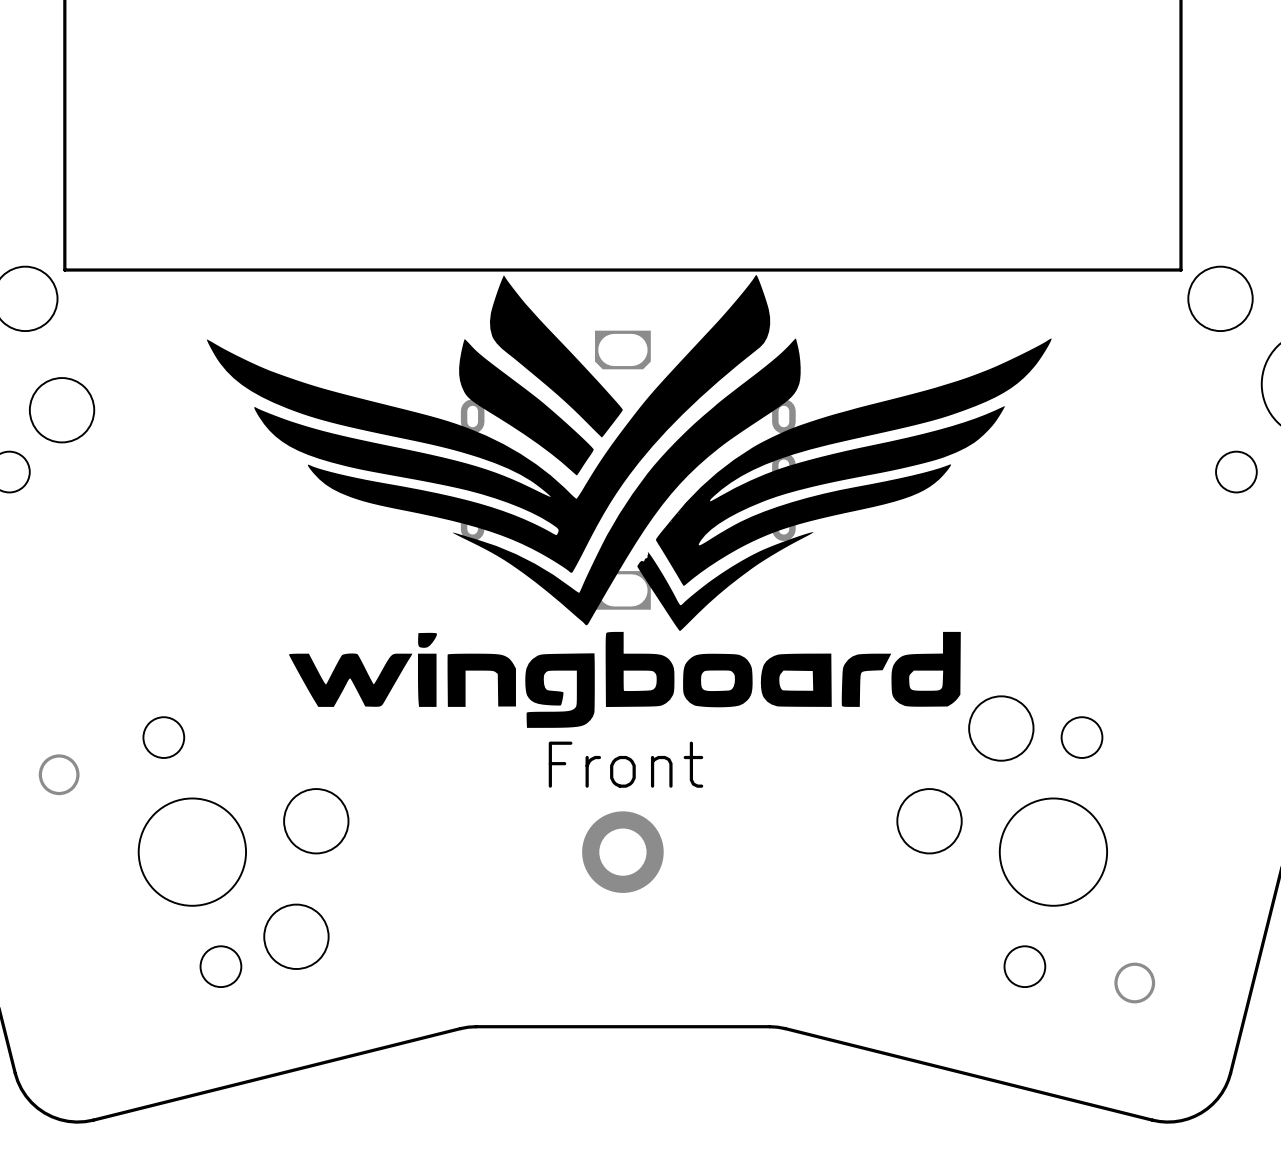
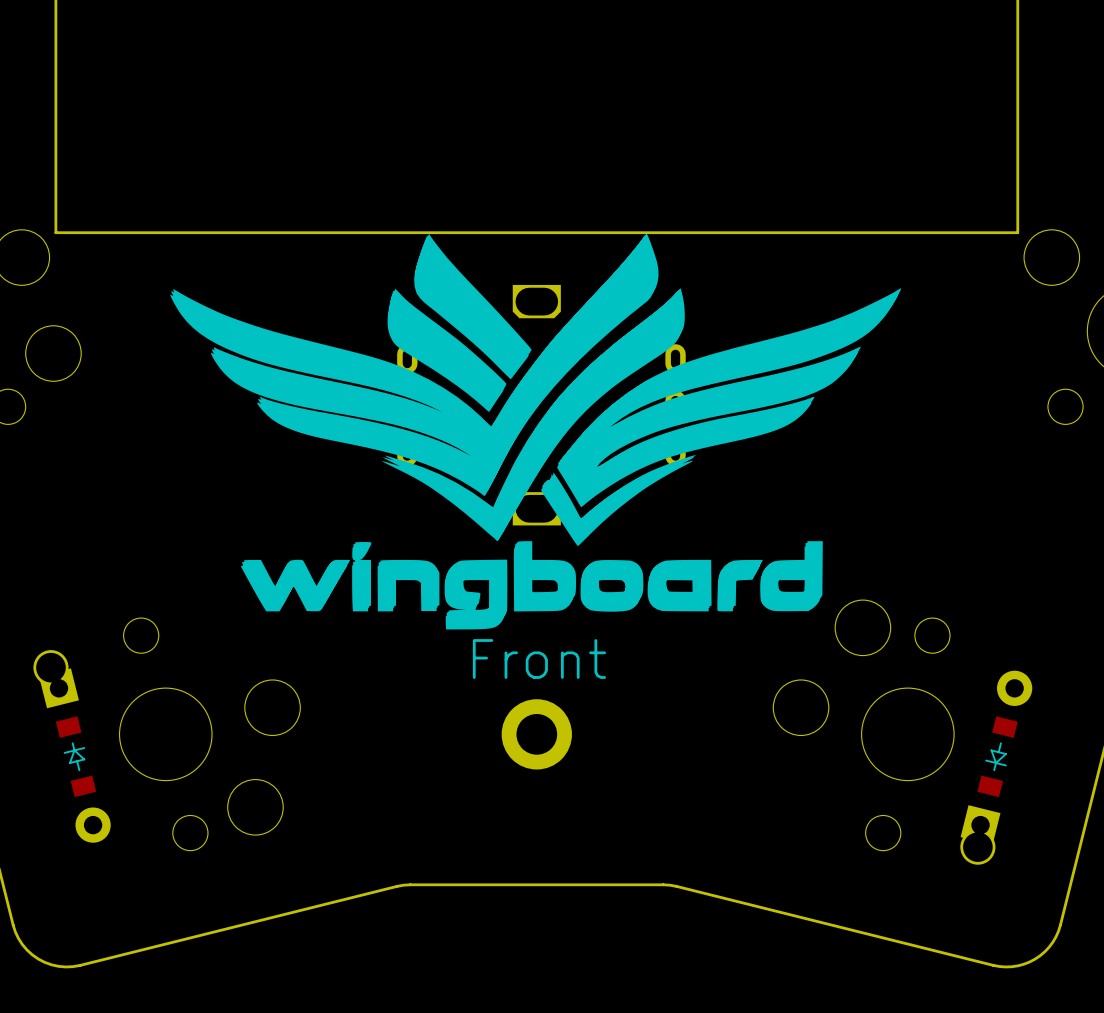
drawing: none -> [170, 233, 901, 630]
drawing: [206, 275, 1052, 728] -> none
part: none -> (74, 755)
part: none -> (996, 757)

